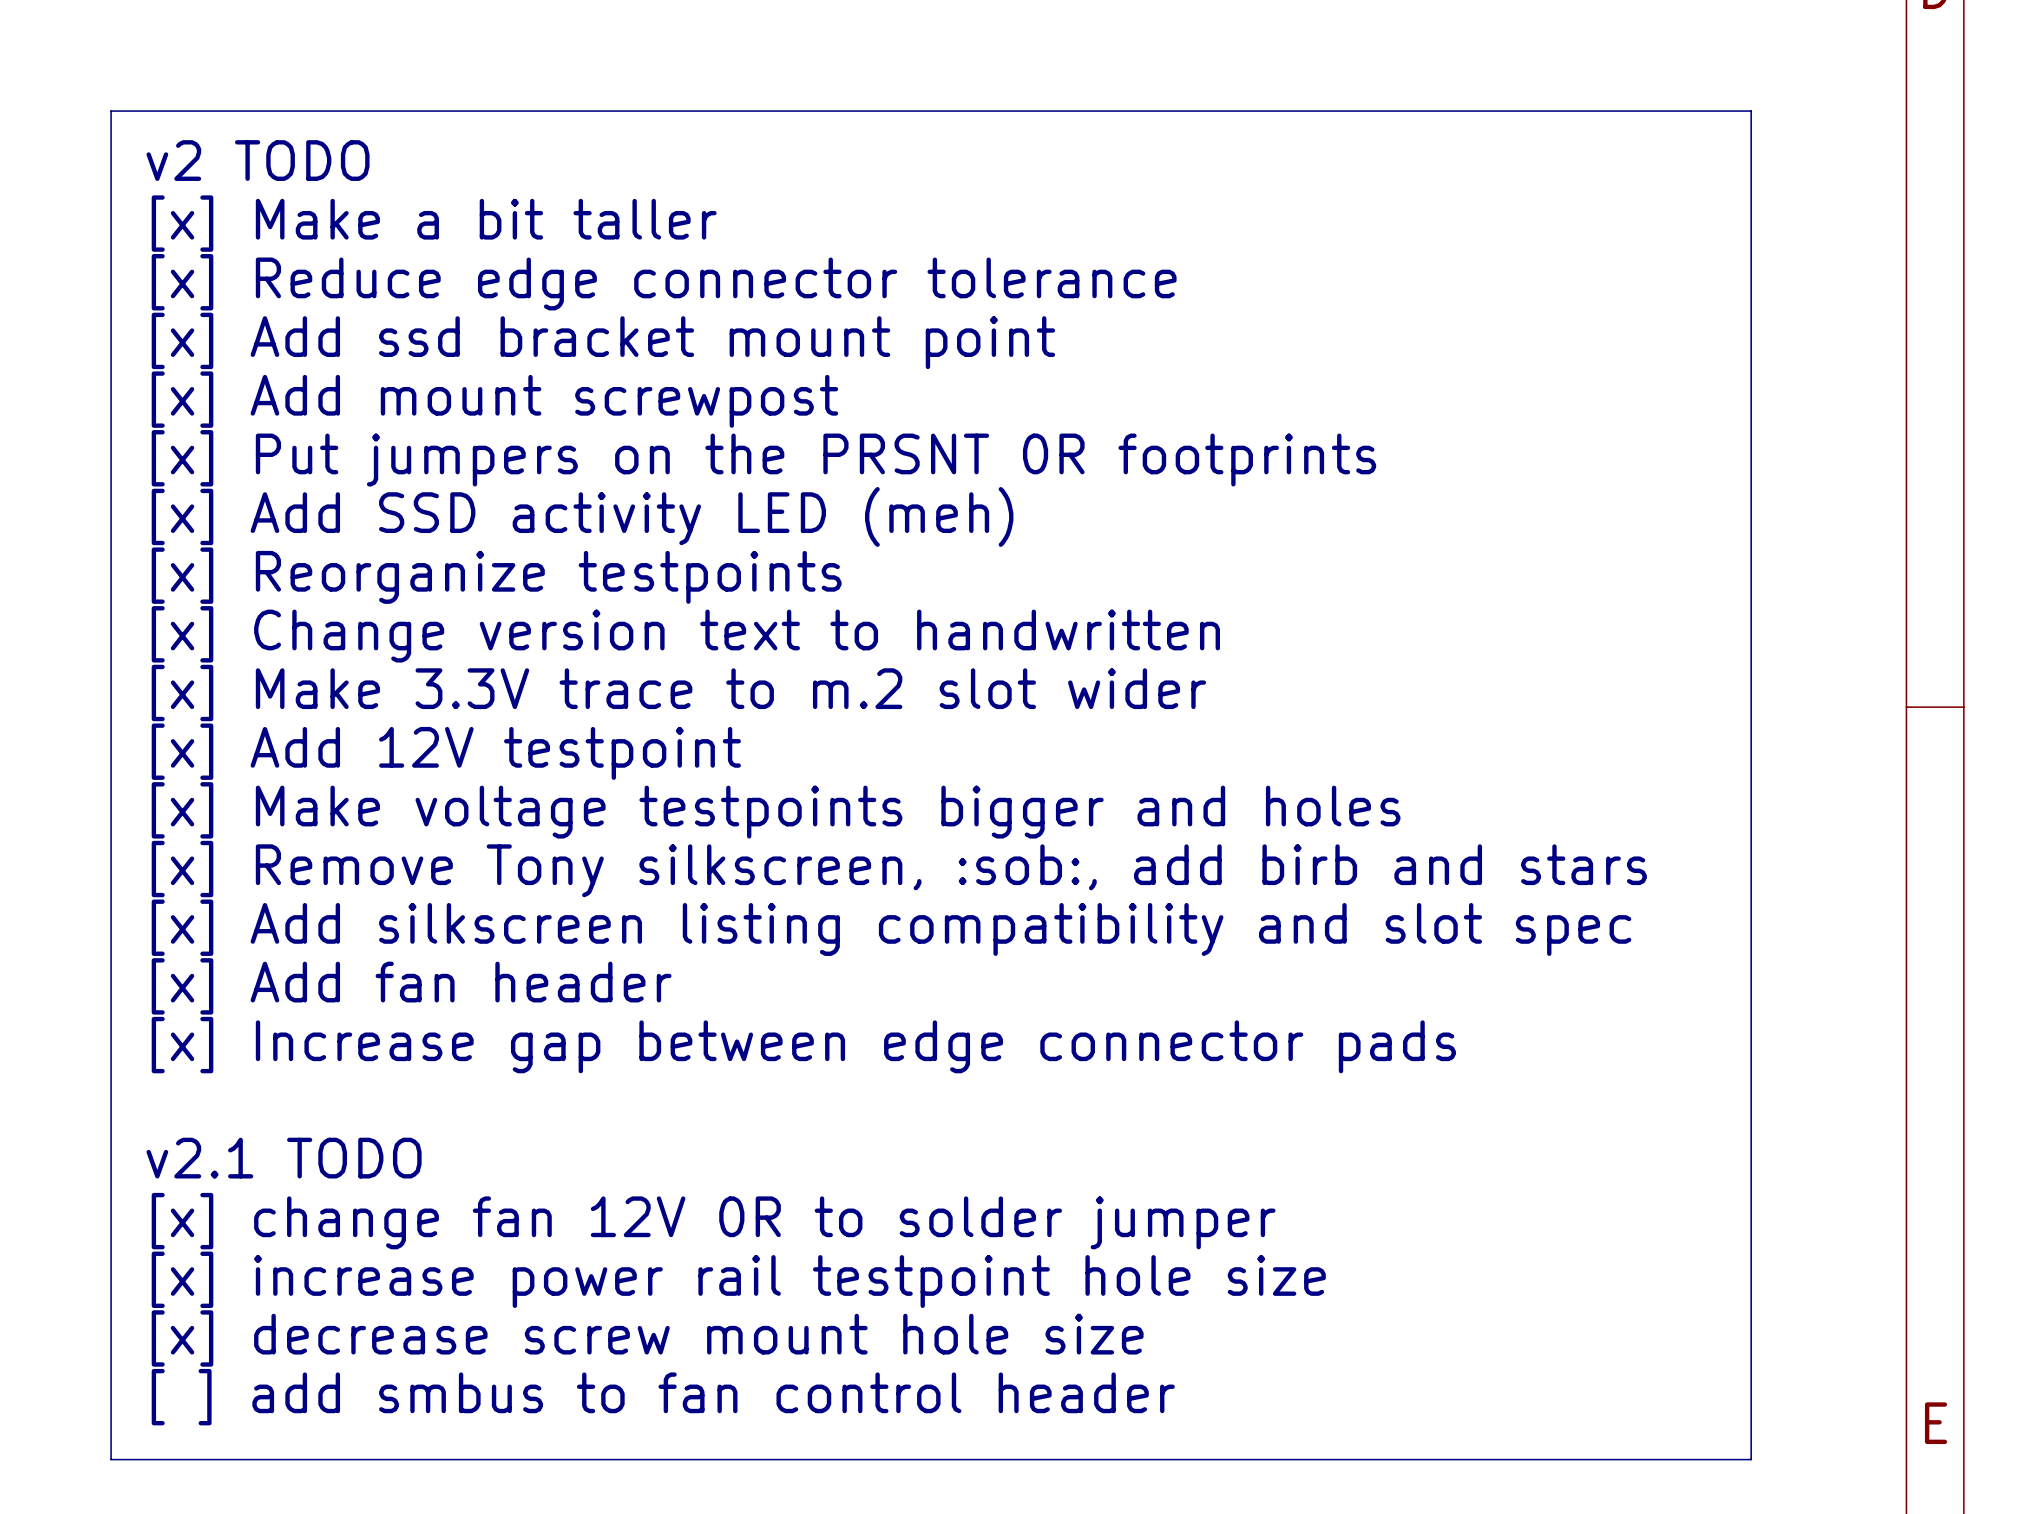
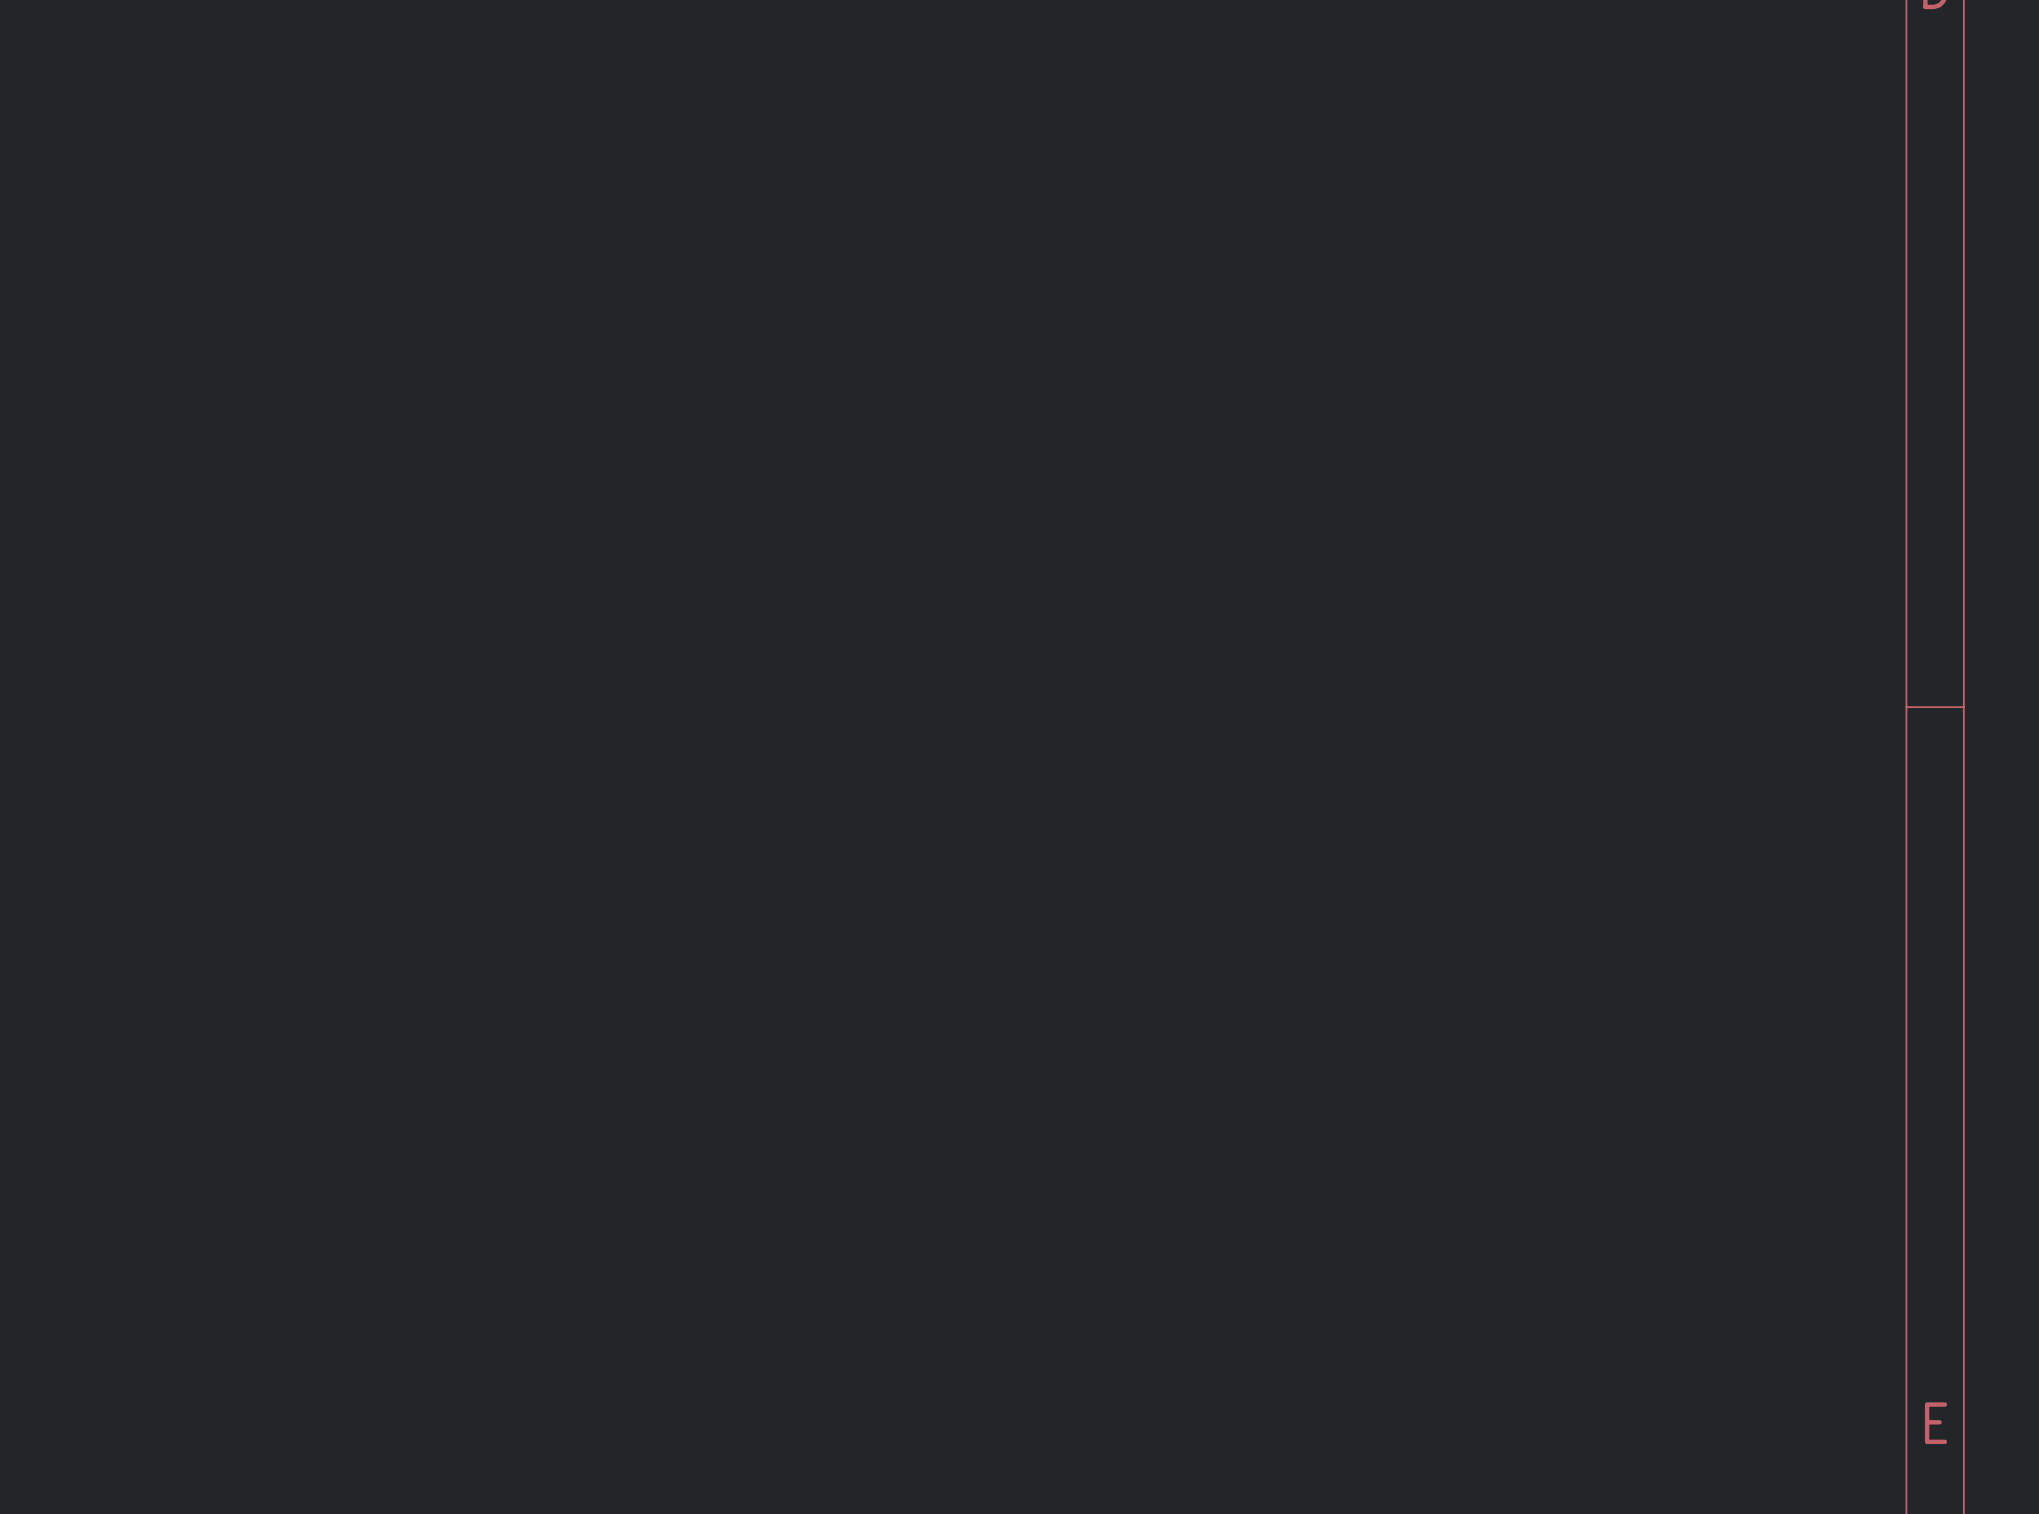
line: (111, 111) (1751, 111) (1751, 1459) (111, 1459) (111, 111) -> none
text: v2 TODO (258, 160) -> none
text: [x] Make a bit taller (434, 223) -> none
text: [x] Reduce edge connector tolerance (664, 282) -> none
text: [x] Add ssd bracket mount point (603, 340) -> none
text: [x] Add mount screwpost (494, 399) -> none
text: [x] Put jumpers on the PRSNT 0R footprints (763, 458) -> none
text: [x] Add SSD activity LED (meh) (582, 516) -> none
text: [x] Reorganize testpoints (496, 575) -> none
text: [x] Change version text to handwritten (685, 634) -> none
text: [x] Make 3.3V trace to m.2 slot wider (678, 693) -> none
text: [x] Add 12V testpoint (446, 751) -> none
text: [x] Make voltage testpoints bigger and holes (776, 810) -> none
text: [x] Remove Tony silkscreen, :sob:, add birb and stars (899, 869) -> none
text: [x] Add silkscreen listing compatibility and slot spec (891, 927) -> none
text: [x] Add fan header (411, 986) -> none
text: [x] Increase gap between edge connector pads (803, 1045) -> none
text: v2.1 TODO (284, 1158) -> none
text: [x] change fan 12V 0R to solder jumper (713, 1221) -> none
text: [x] increase power rail testpoint hole size (738, 1279) -> none
text: [x] decrease screw mount hole size (647, 1338) -> none
text: [ ] add smbus to fan control header (663, 1397) -> none

